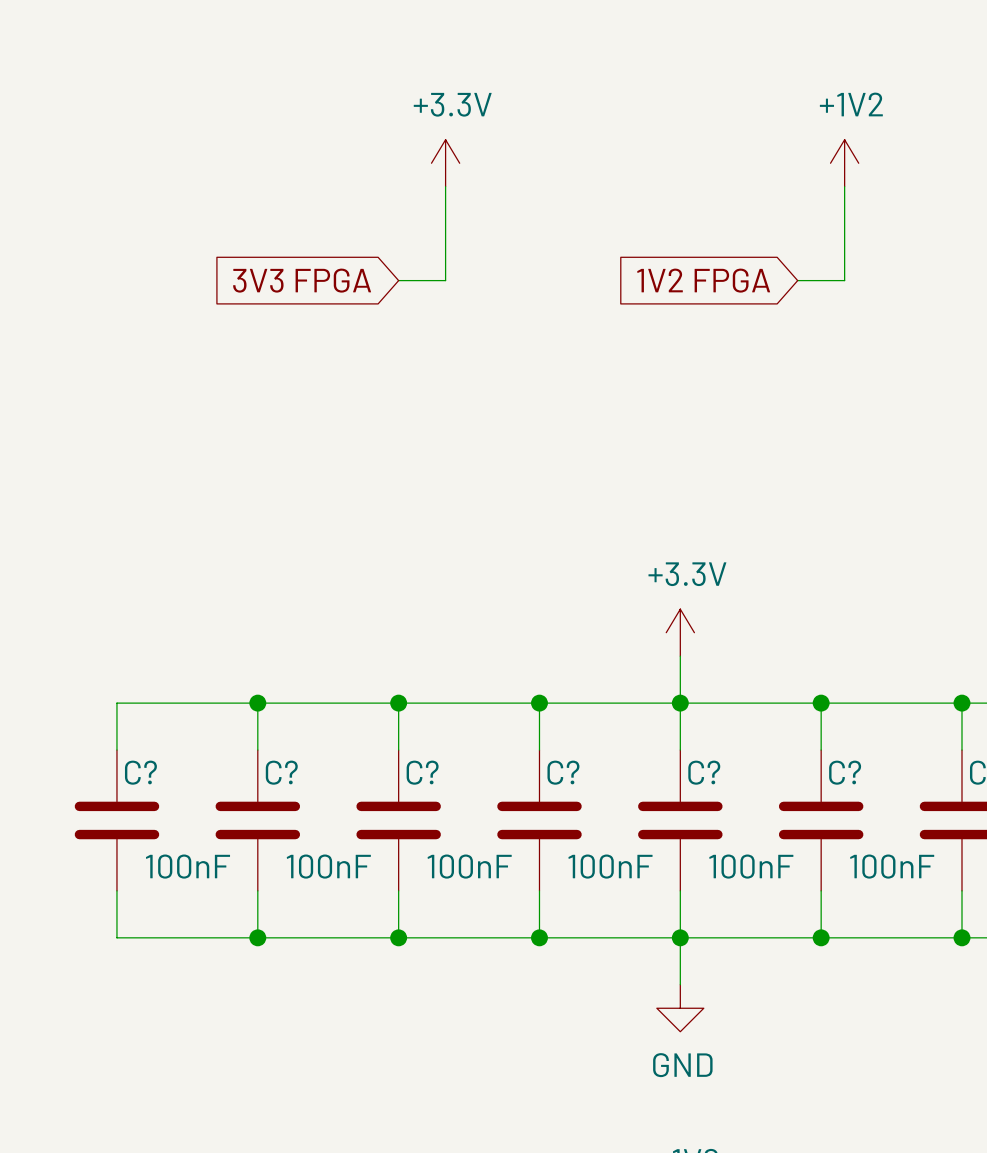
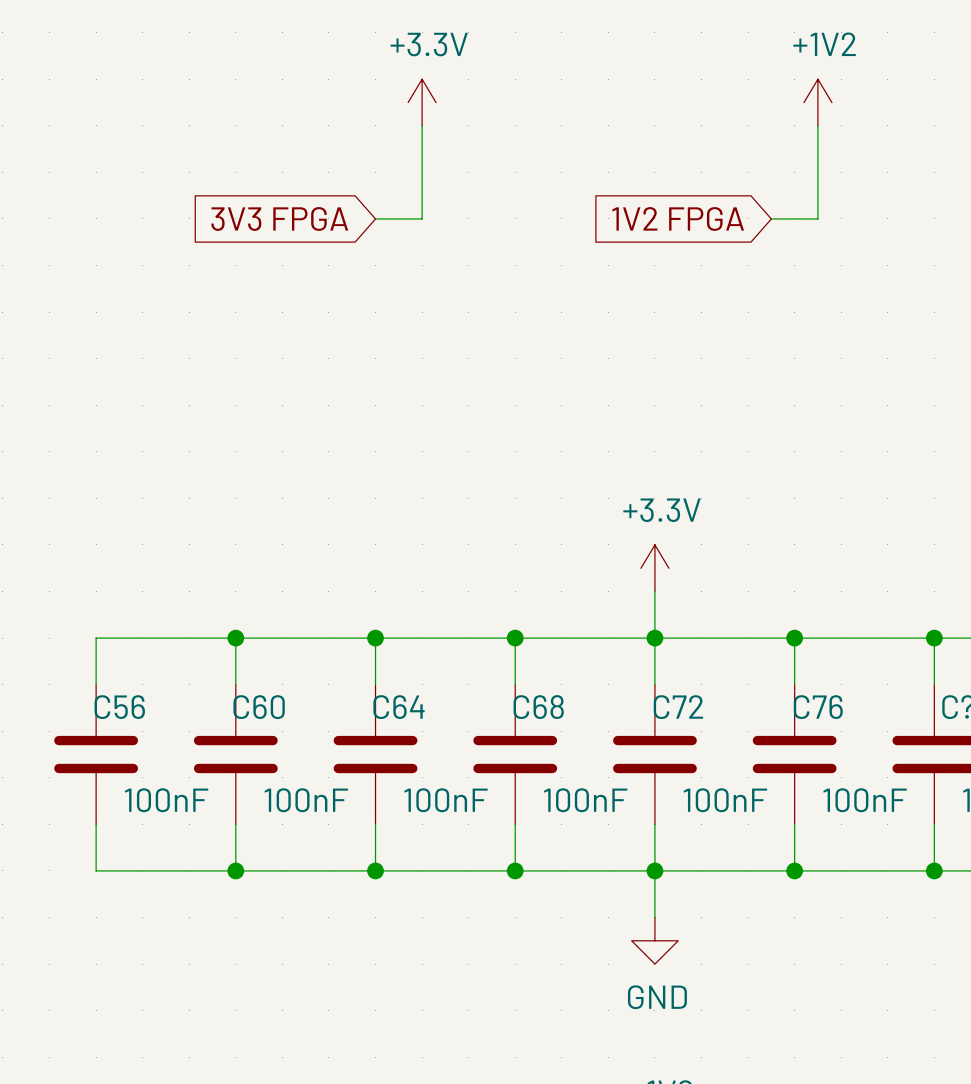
C? name: C? (140, 772) -> C56 (119, 707)
C? name: C? (281, 772) -> C60 (259, 707)
C? name: C? (422, 772) -> C64 (398, 707)
C? name: C? (563, 772) -> C68 (538, 707)
C? name: C? (704, 772) -> C72 (678, 707)
C? name: C? (845, 772) -> C76 (818, 707)

